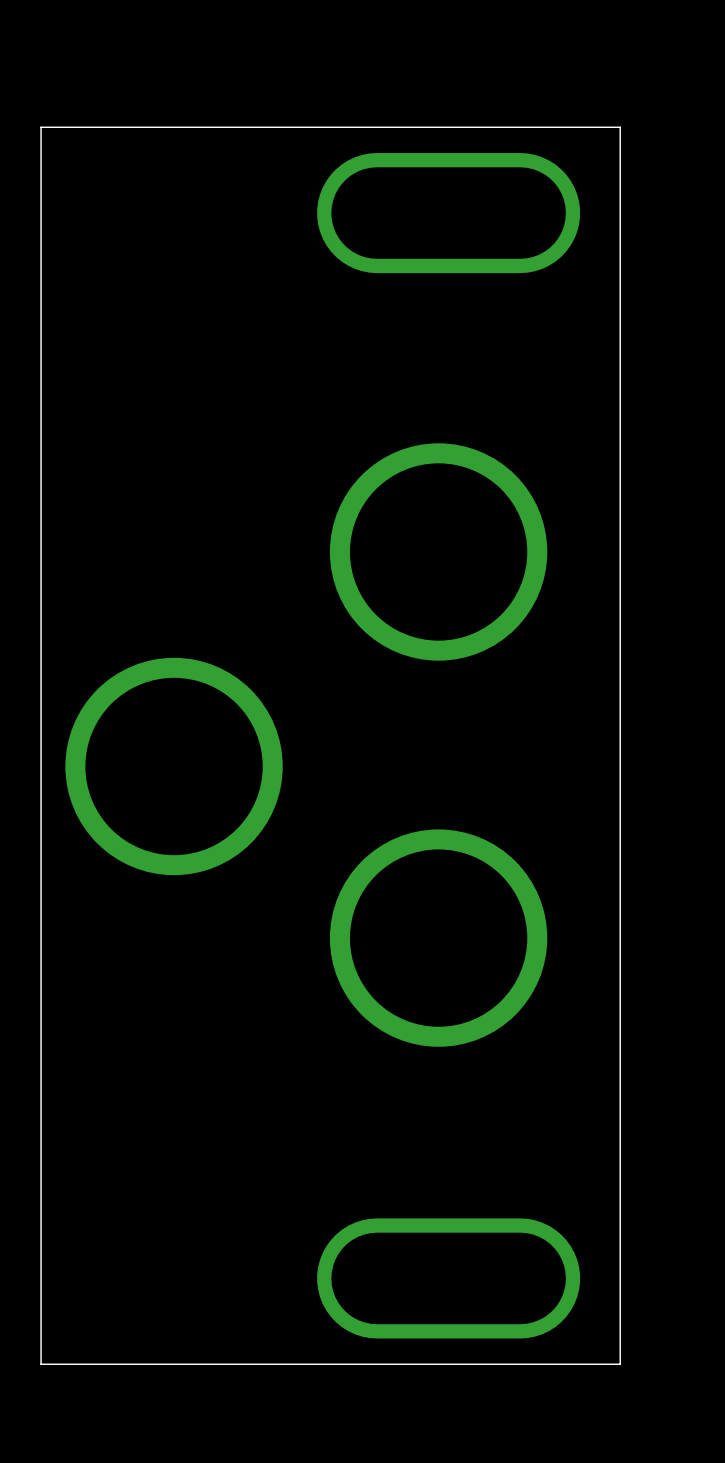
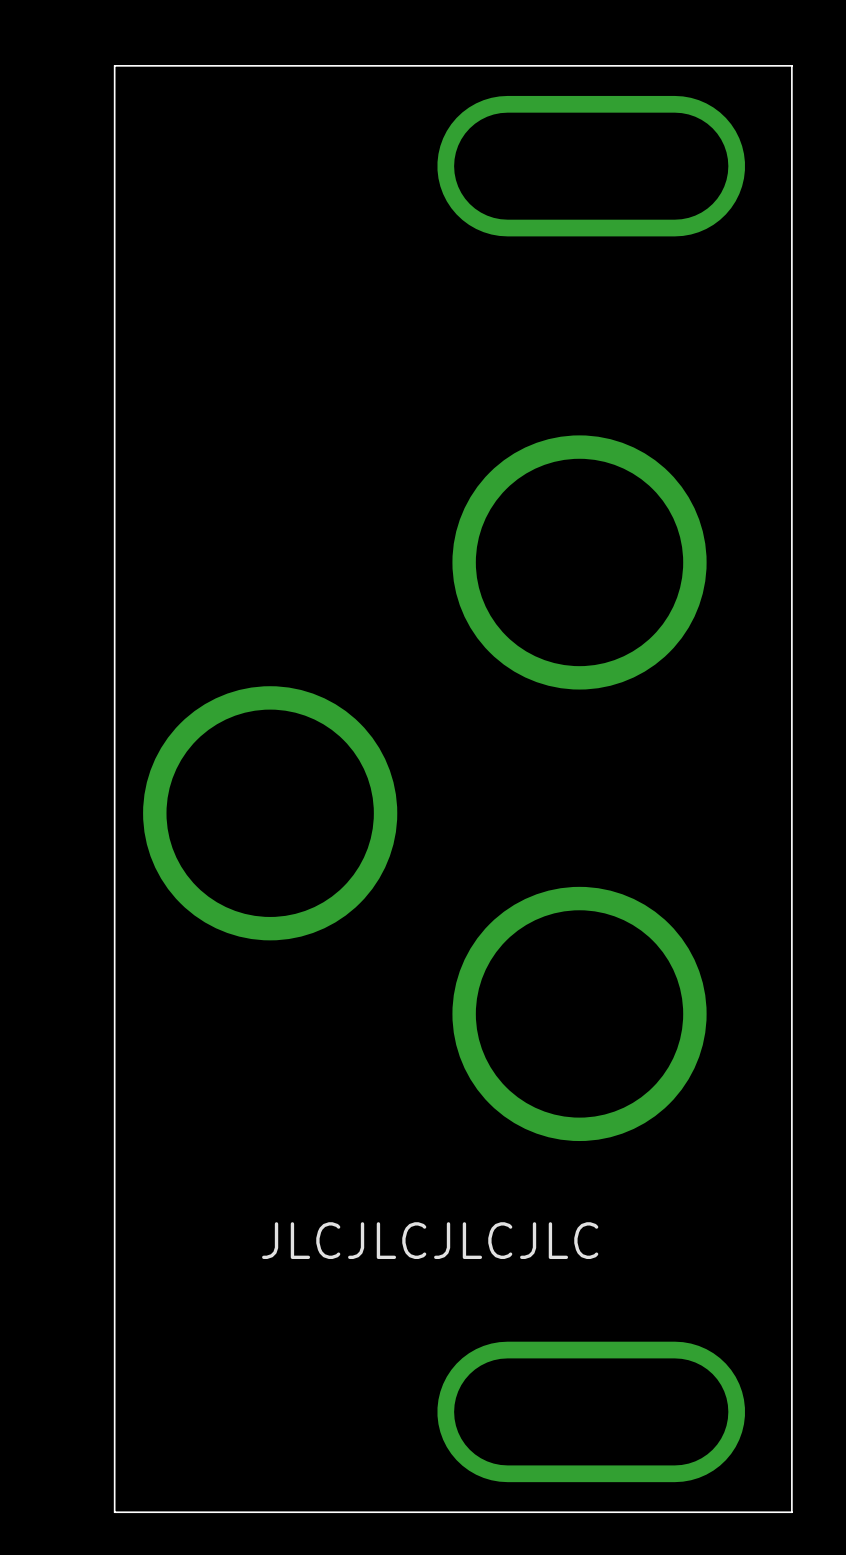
text: none -> JLCJLCJLCJLC (430, 1240)

